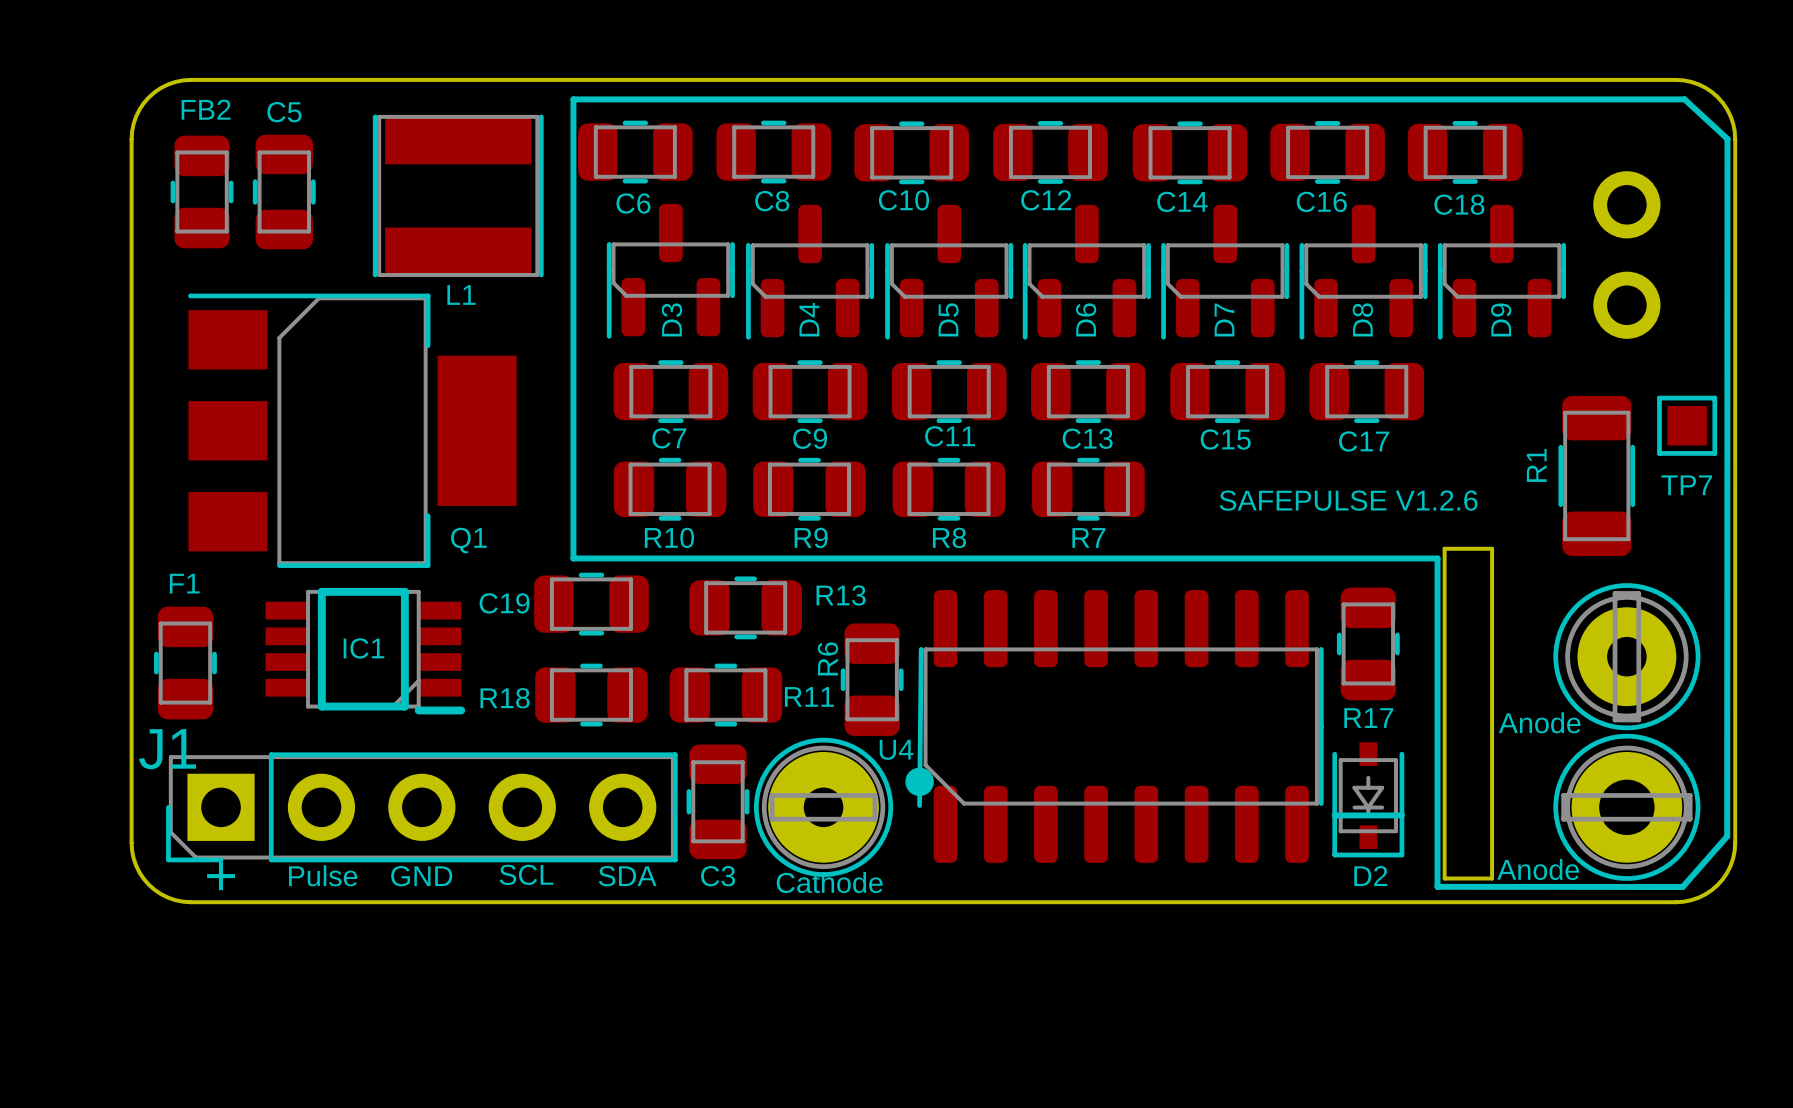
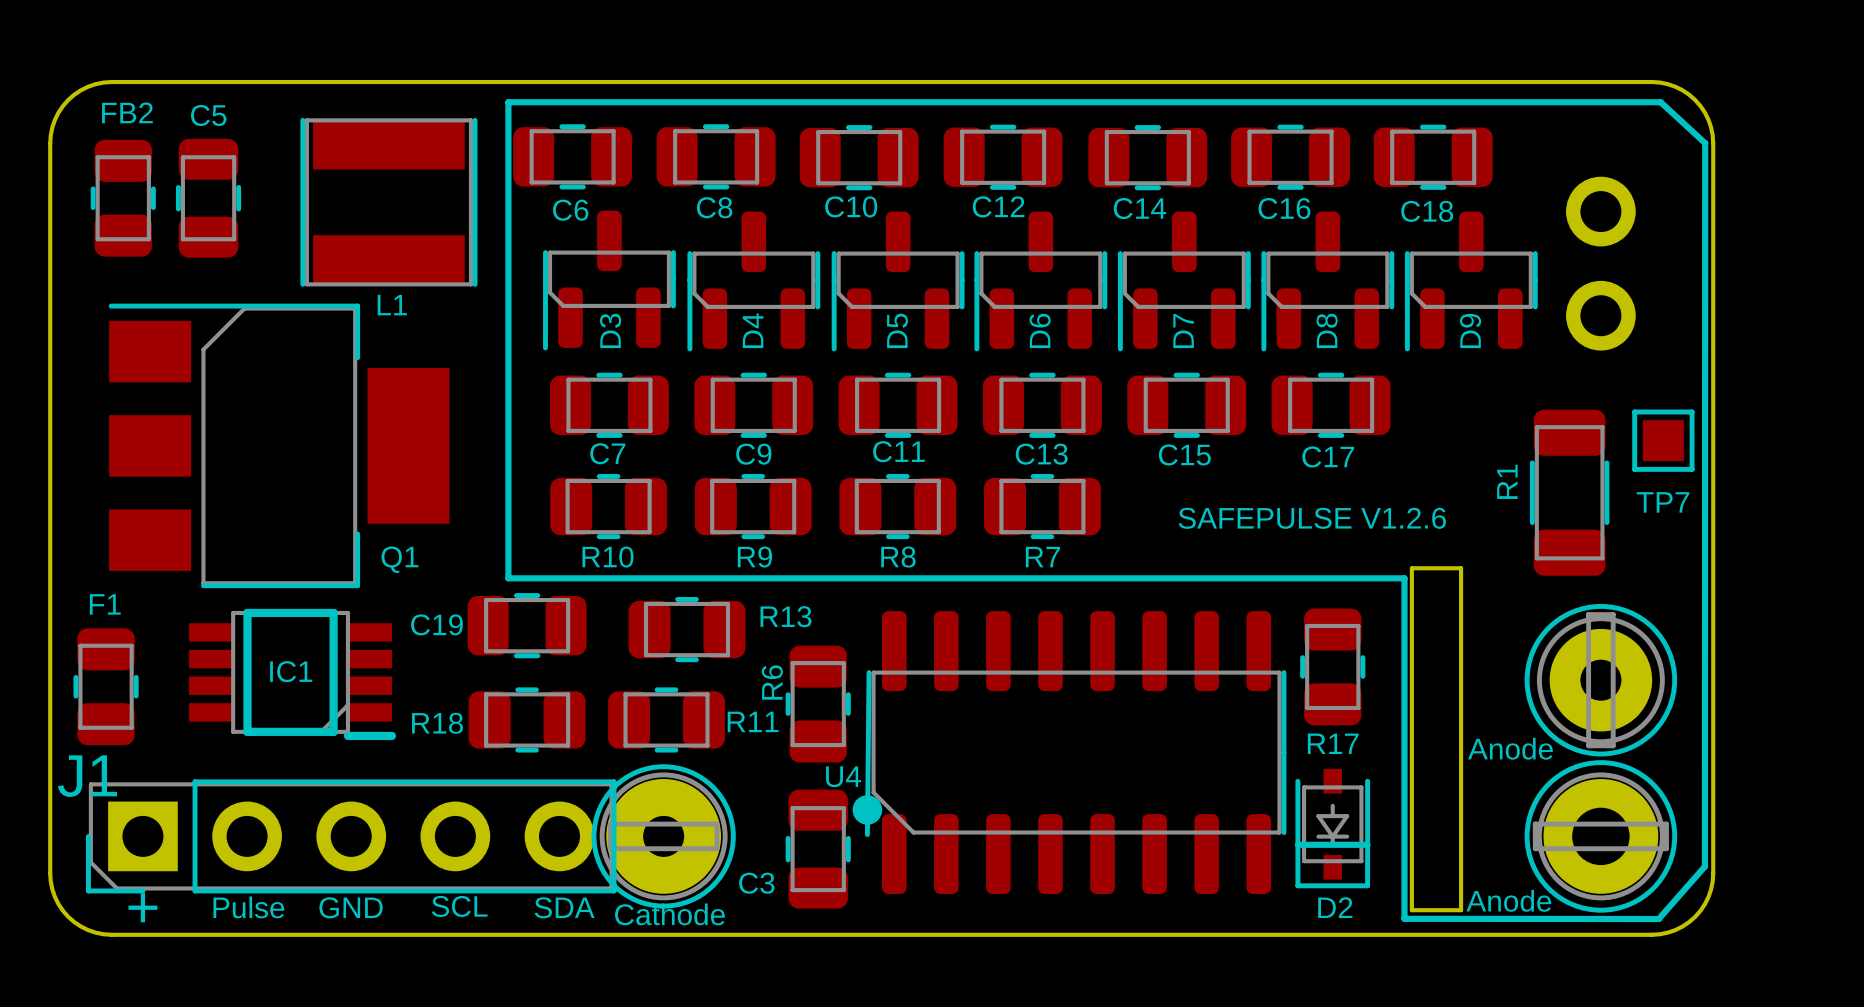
C3 position: (717, 801) -> (818, 849)
part position: (823, 807) -> (663, 836)
C3 name position: C3 (718, 876) -> C3 (756, 883)

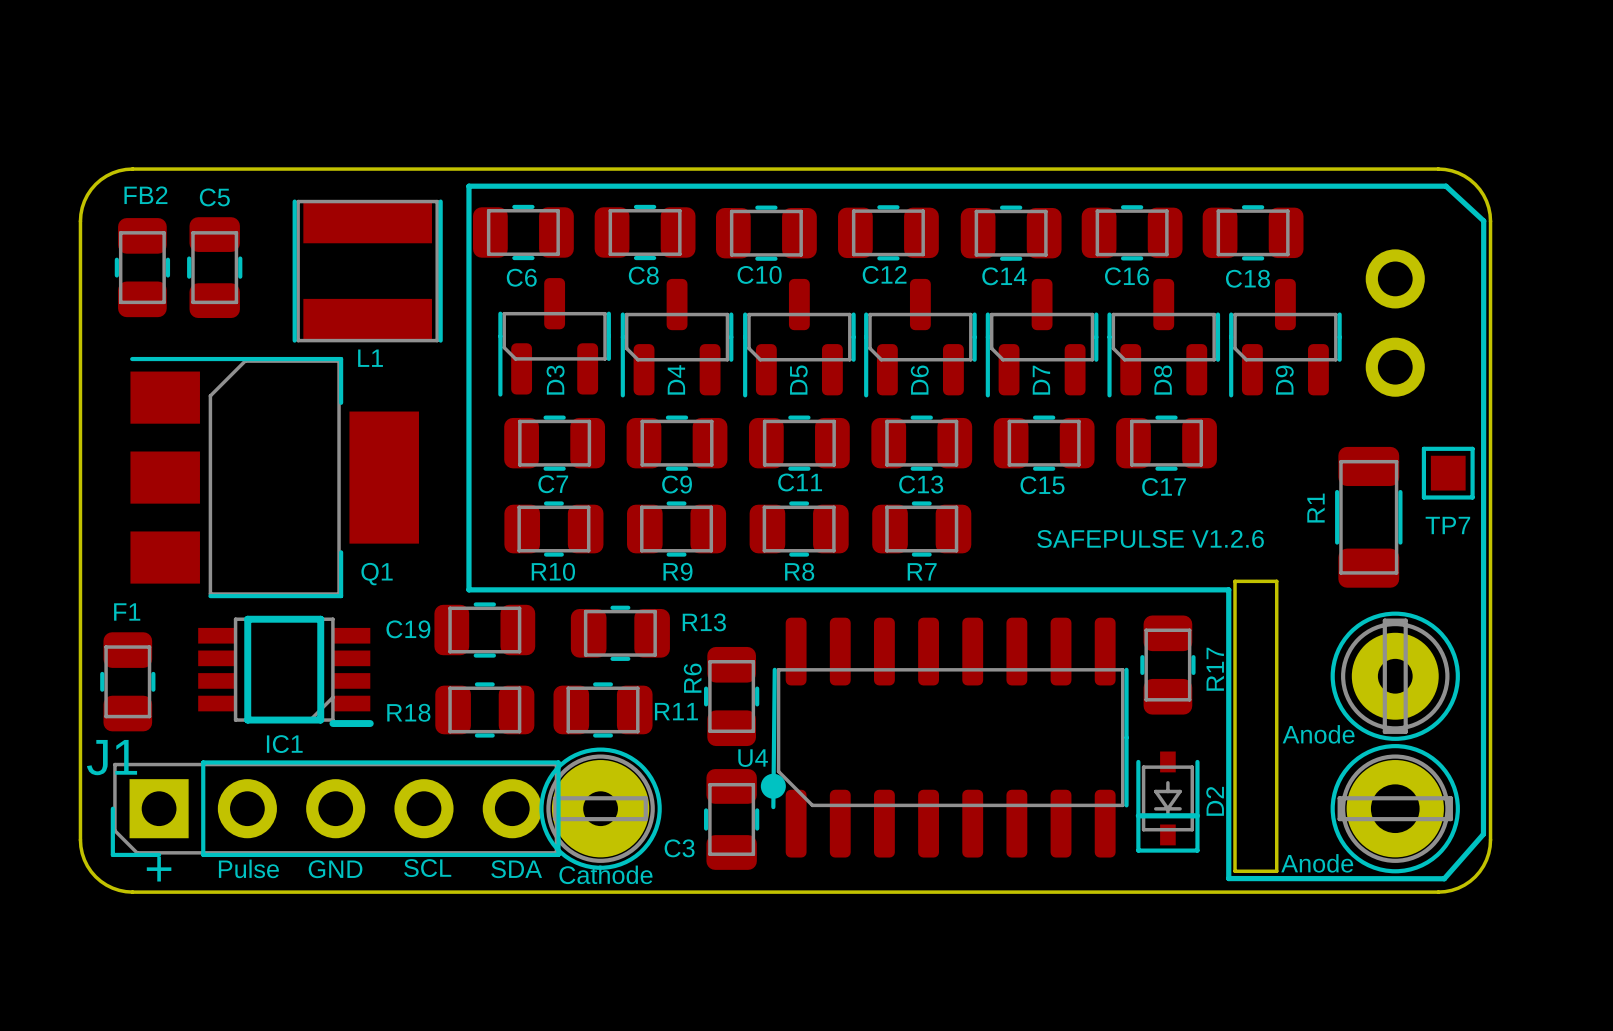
IC1 name position: IC1 (291, 671) -> IC1 (284, 744)
R17 name rotation: 0° (1333, 743) -> 90° counterclockwise (1215, 669)
R17 name position: R17 (1333, 743) -> R17 (1215, 669)
D2 name rotation: 0° (1335, 907) -> 90° counterclockwise (1215, 801)
D2 name position: D2 (1335, 907) -> D2 (1215, 801)

